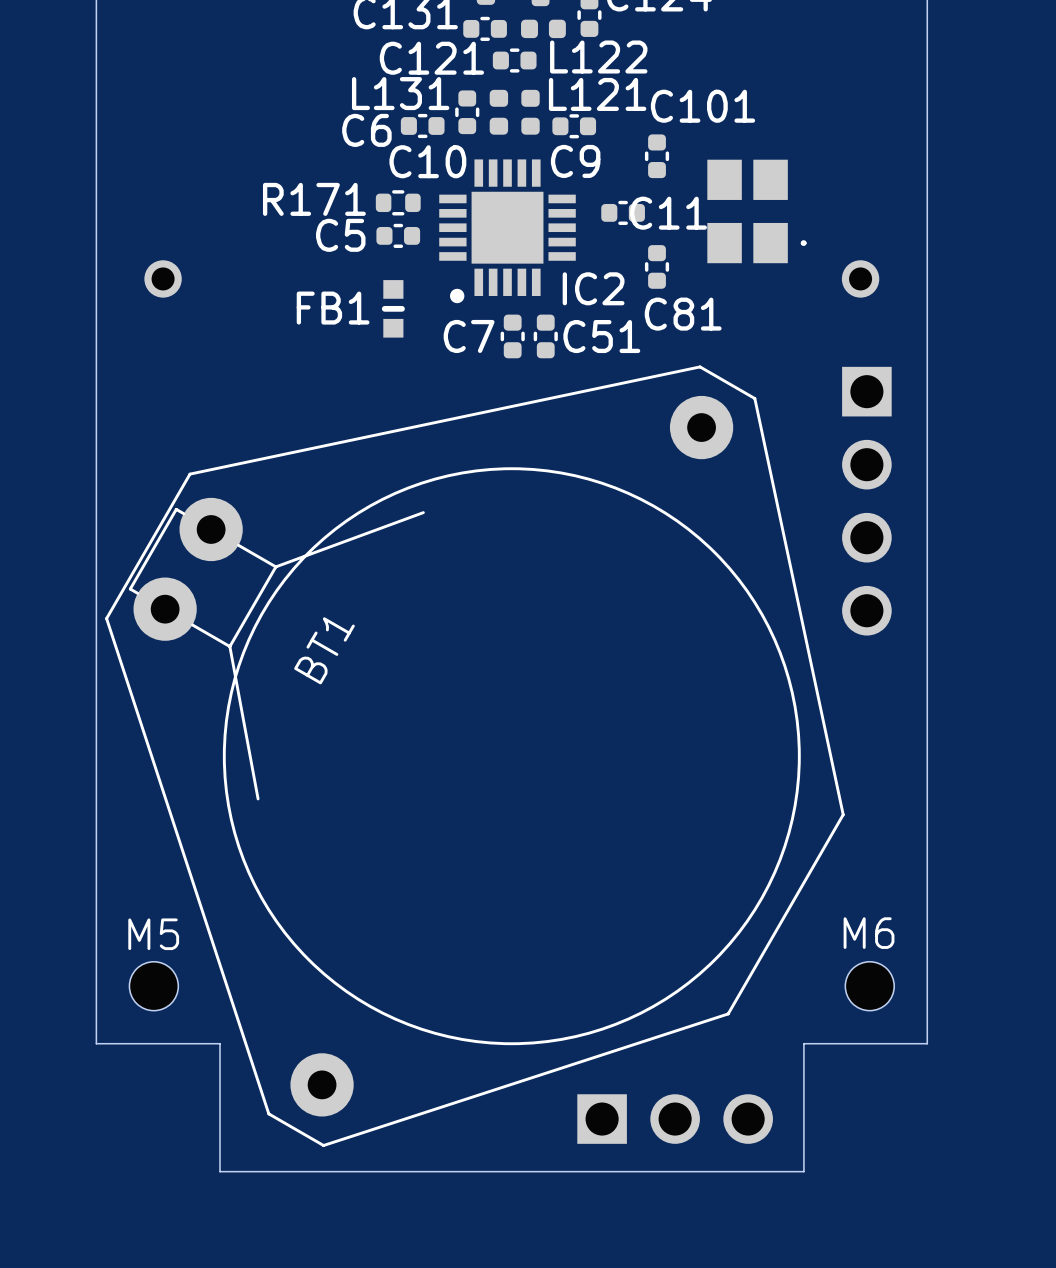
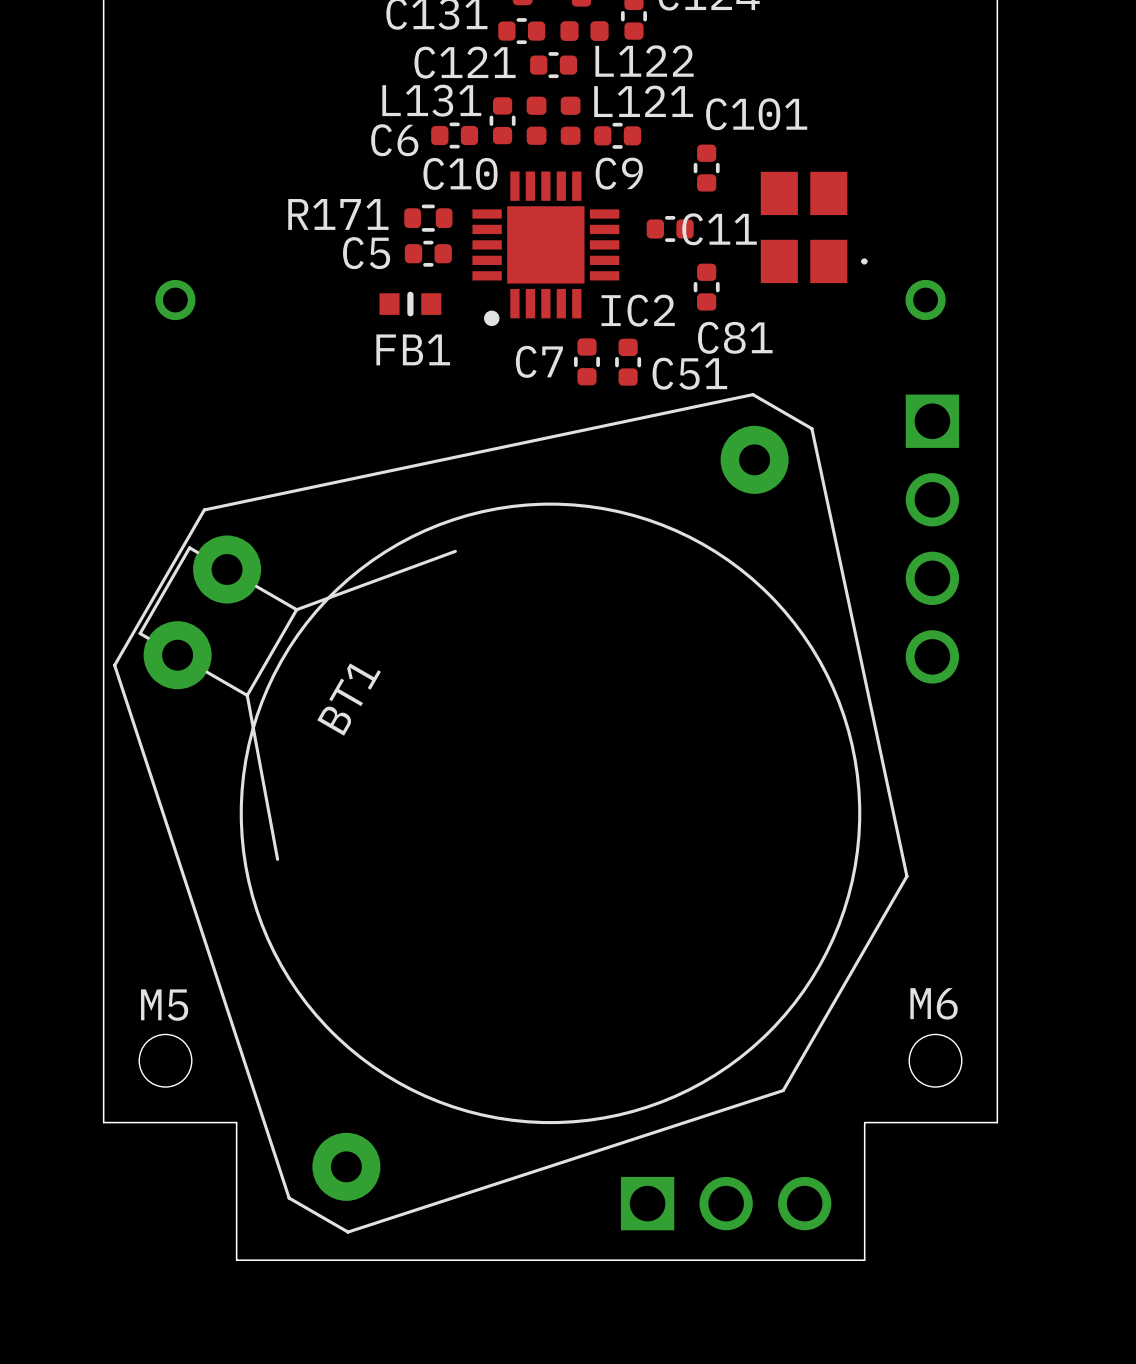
FB1 name position: FB1 (333, 308) -> FB1 (413, 349)
FB1 rotation: 0° (393, 308) -> 90° clockwise (410, 304)
C7: (512, 336) -> none
C51: none -> (628, 362)
C51 name: C51 (601, 336) -> C7 (539, 361)

